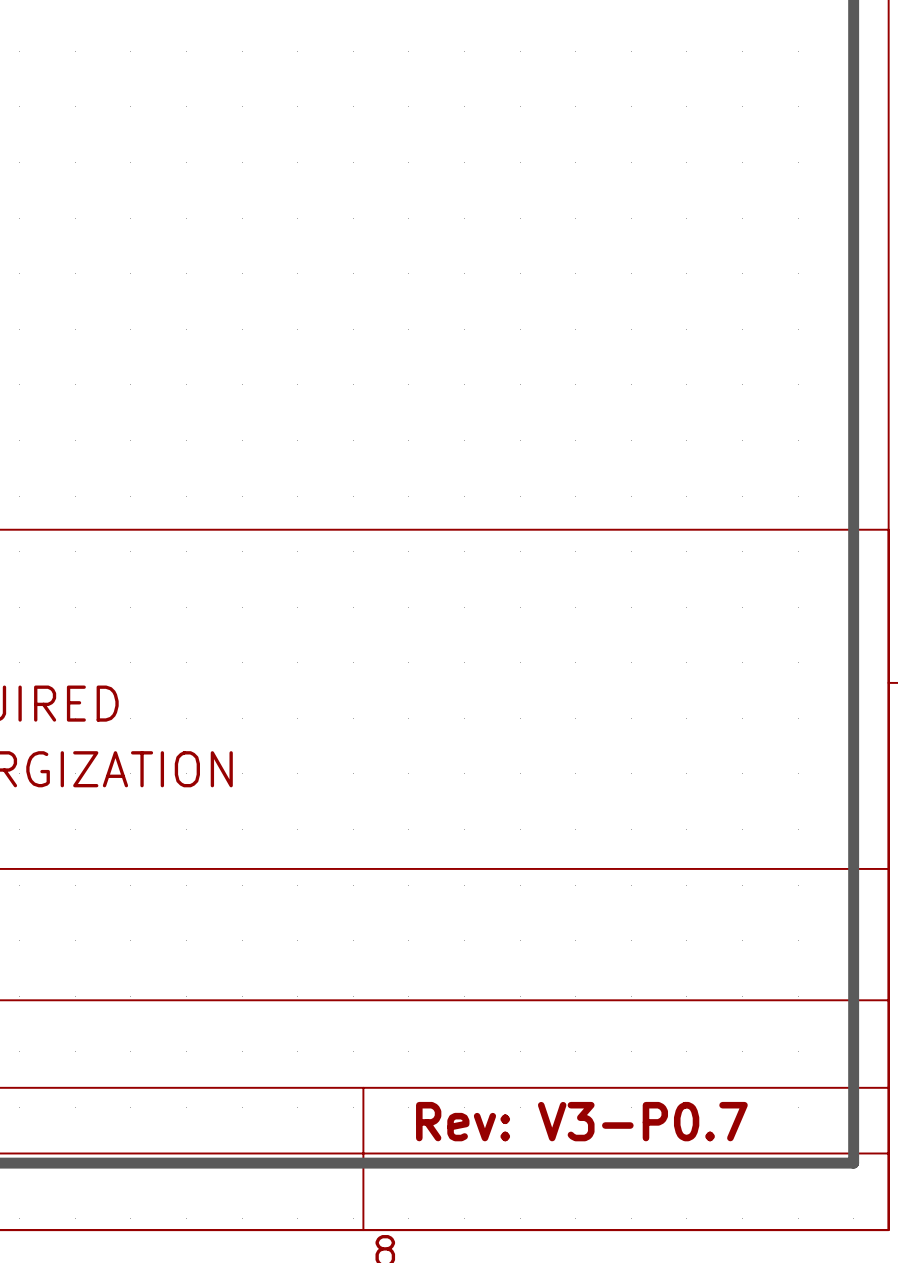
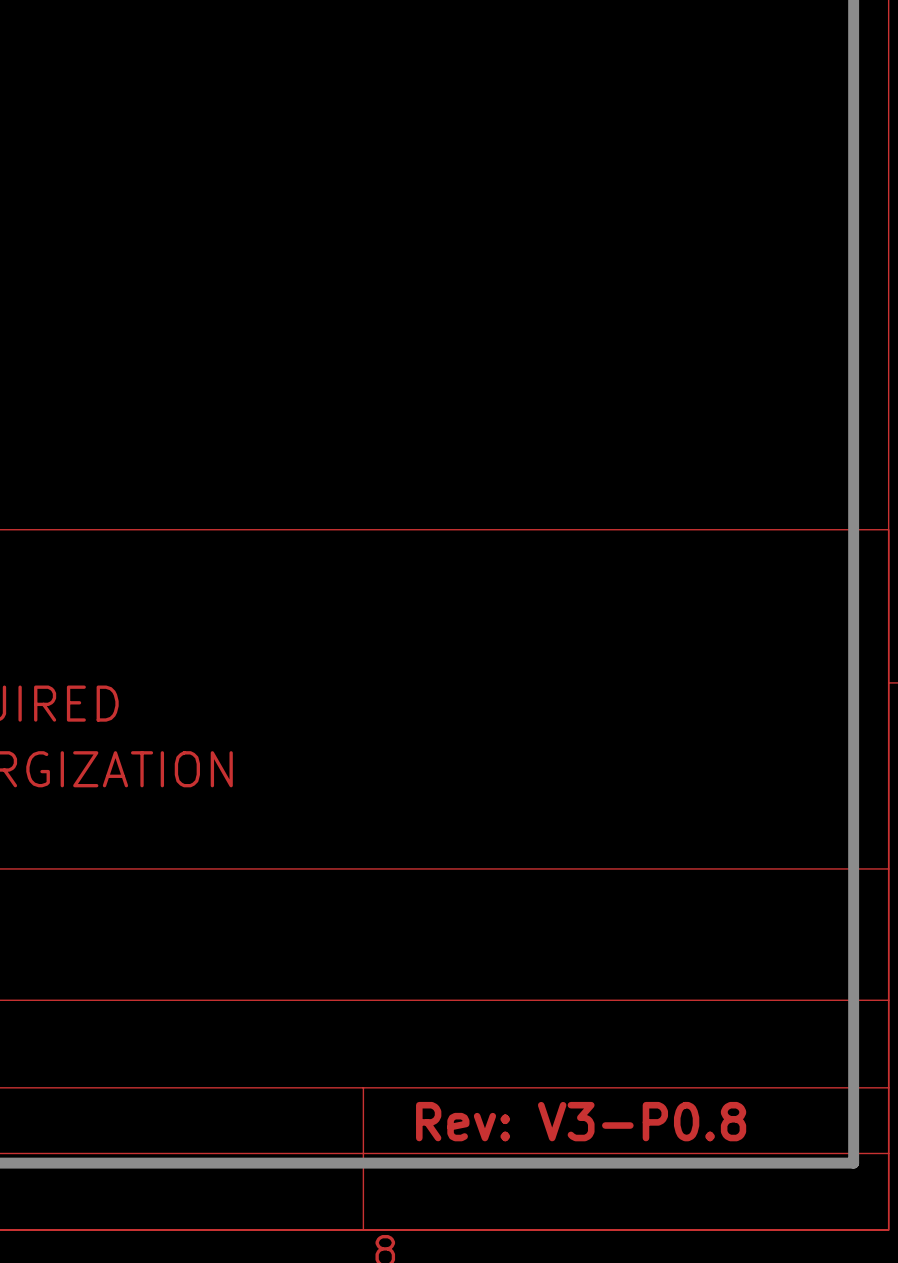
title block: Rev: V3-P0.7 (581, 1121) -> Rev: V3-P0.8 (581, 1121)

